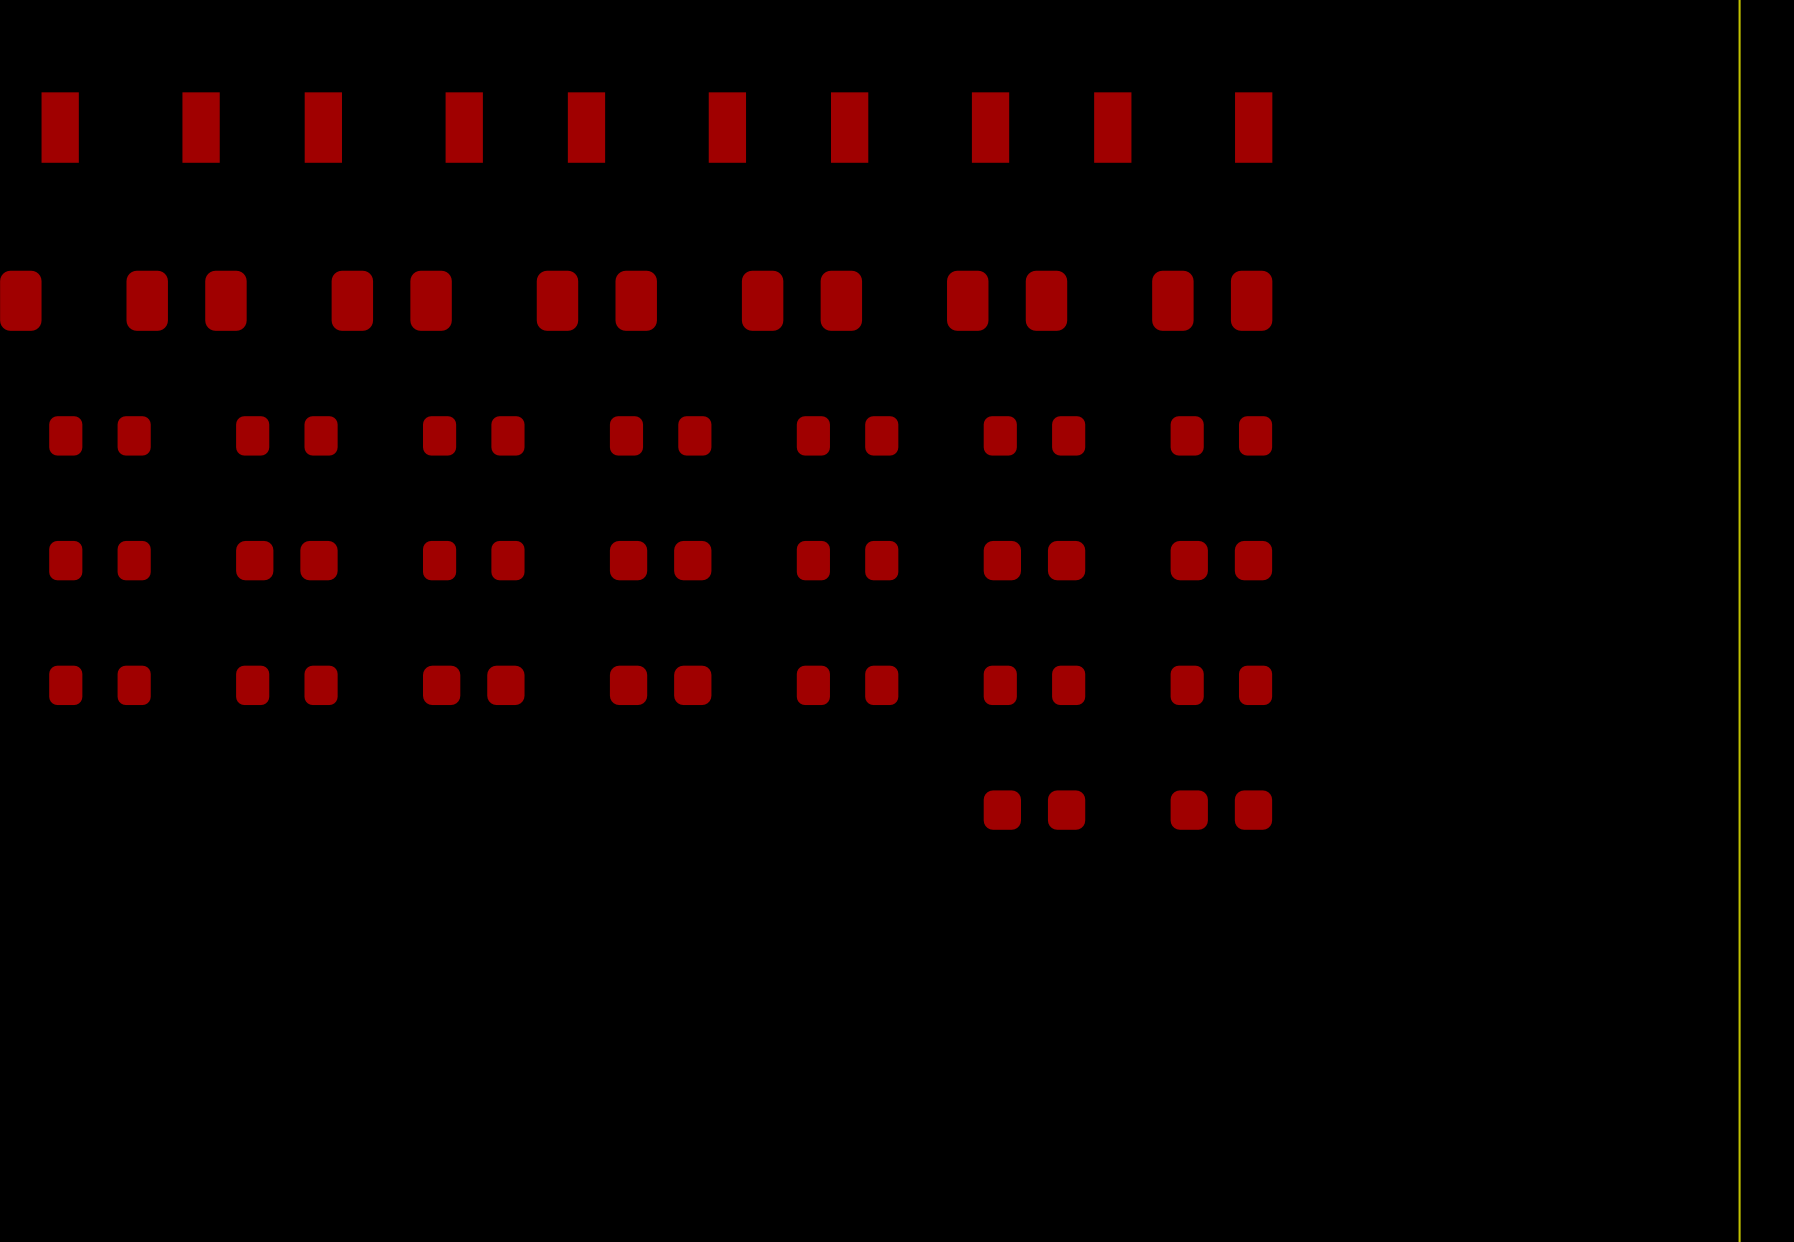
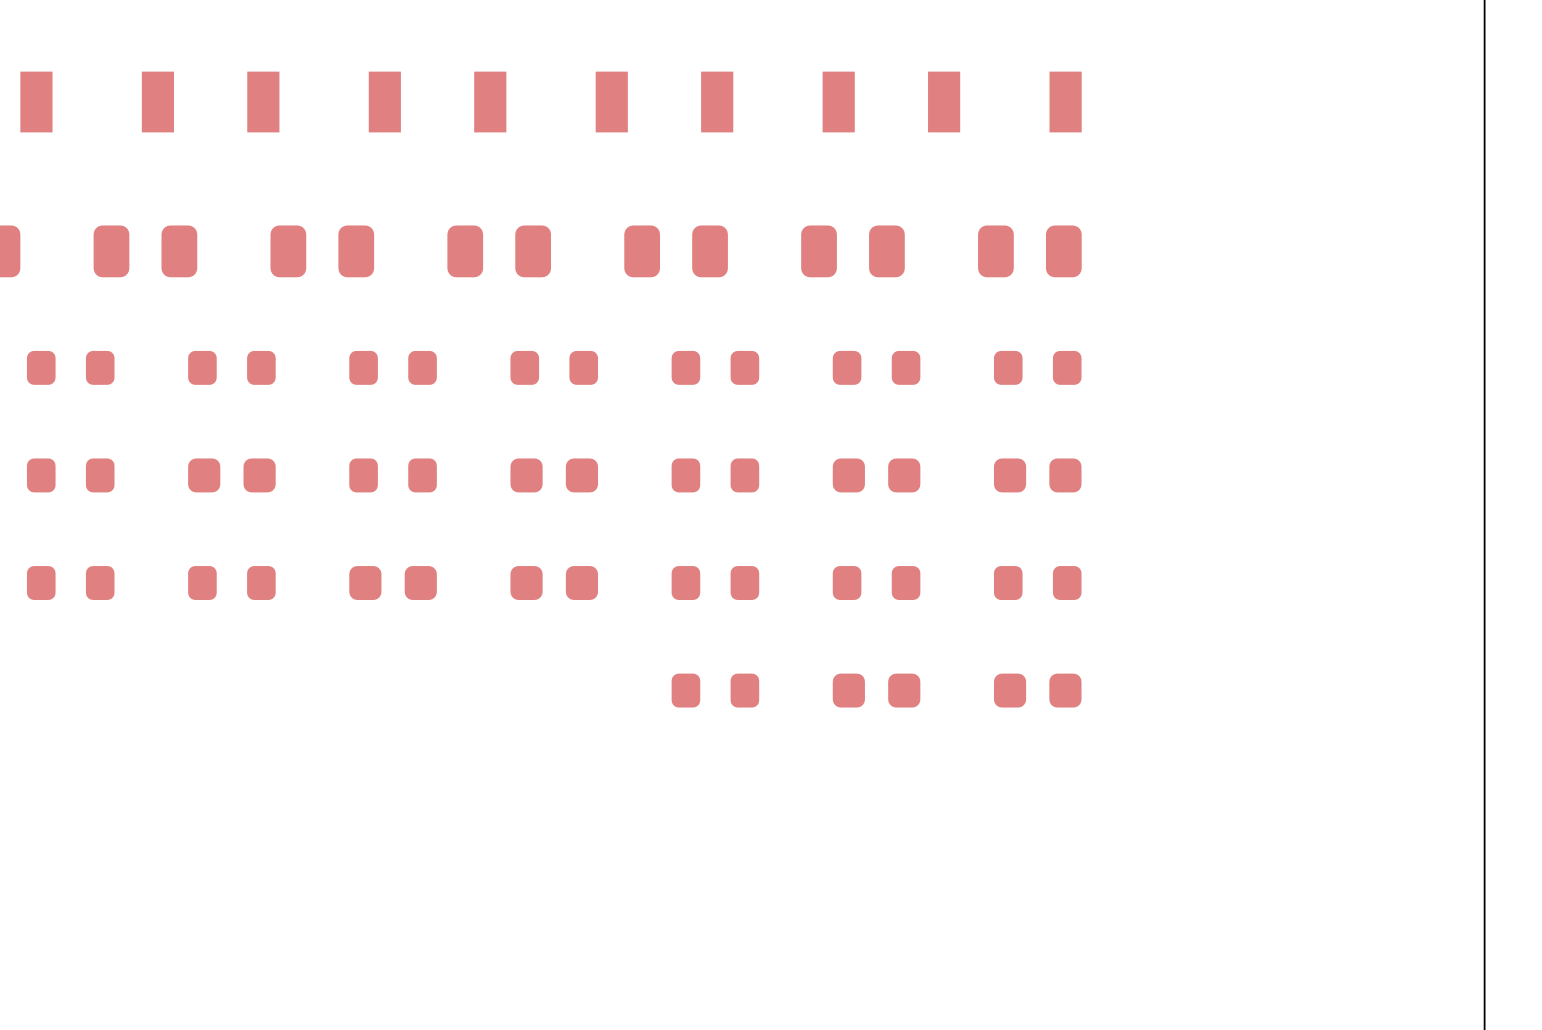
part: none -> (715, 690)

